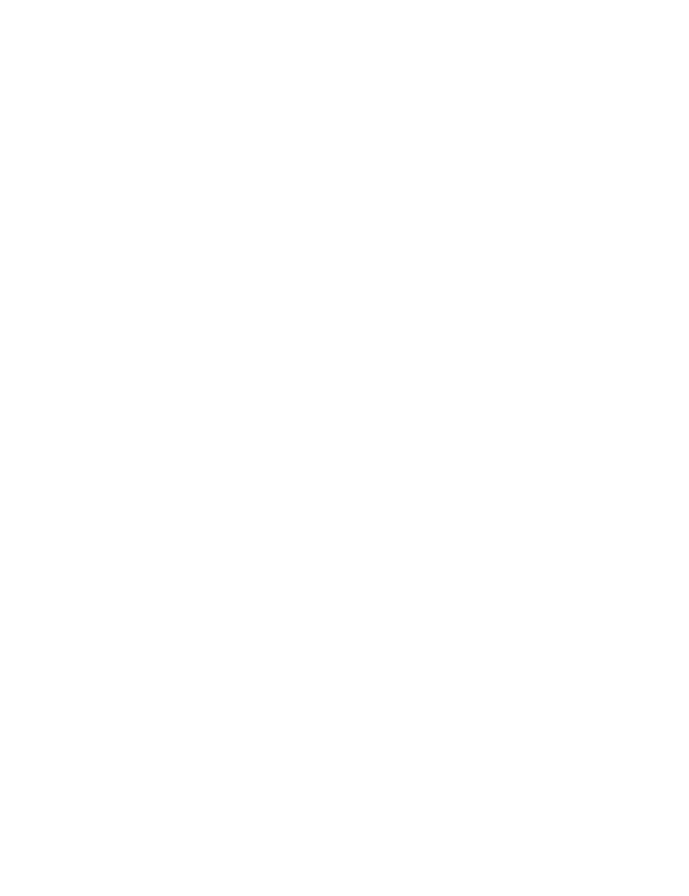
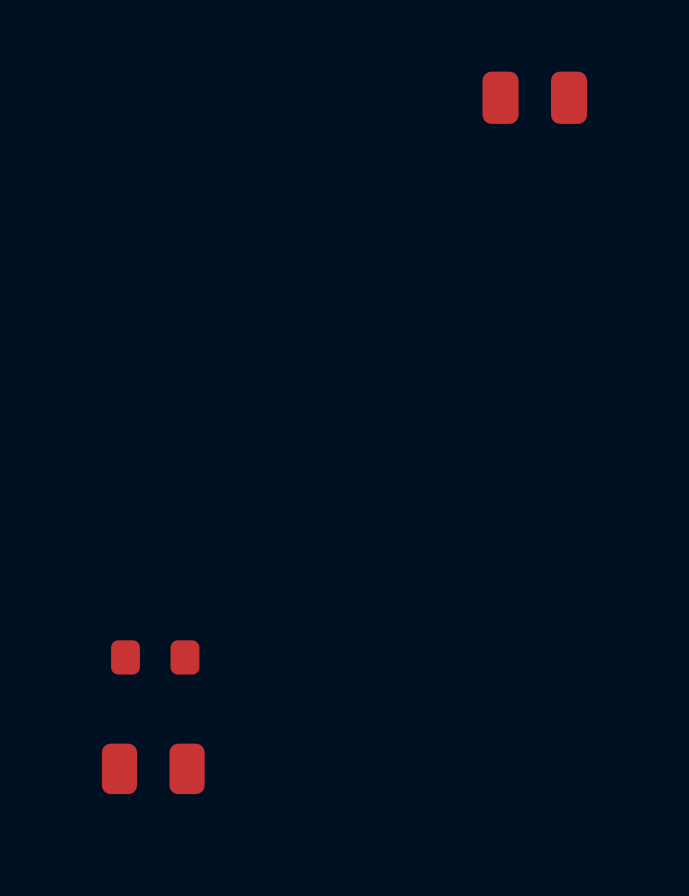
part: none -> (534, 97)
part: none -> (155, 657)
part: none -> (153, 768)

